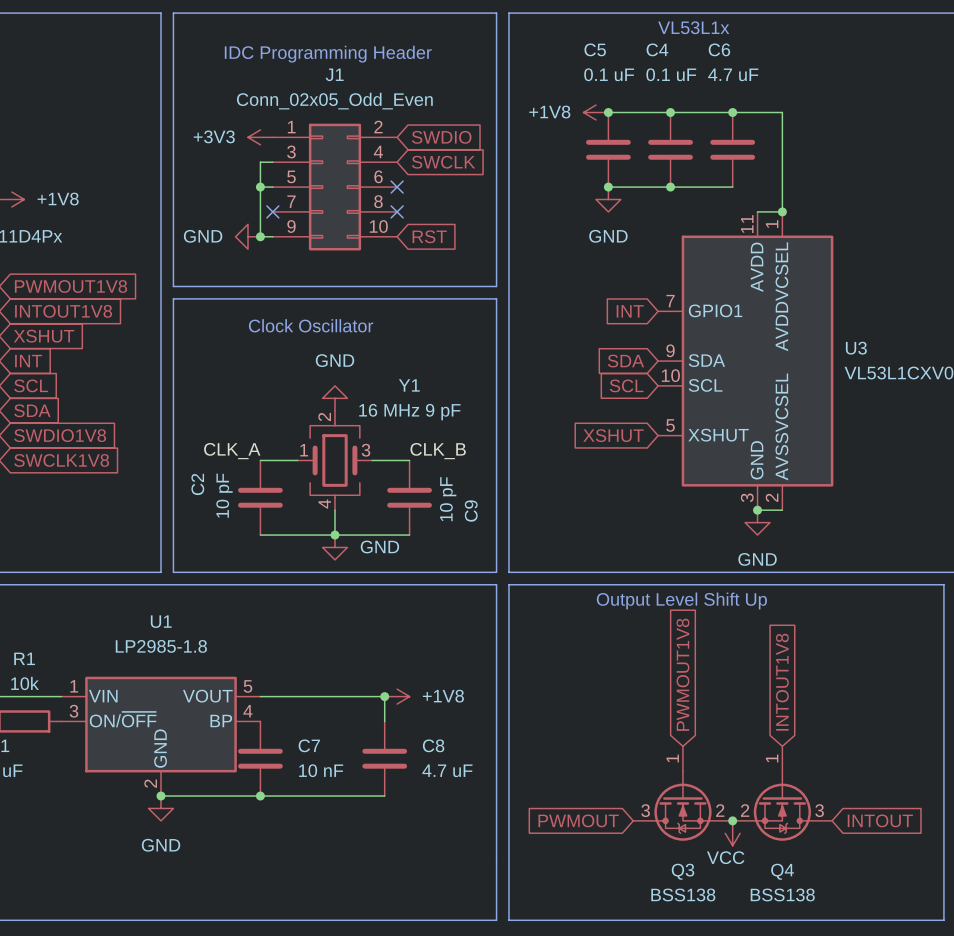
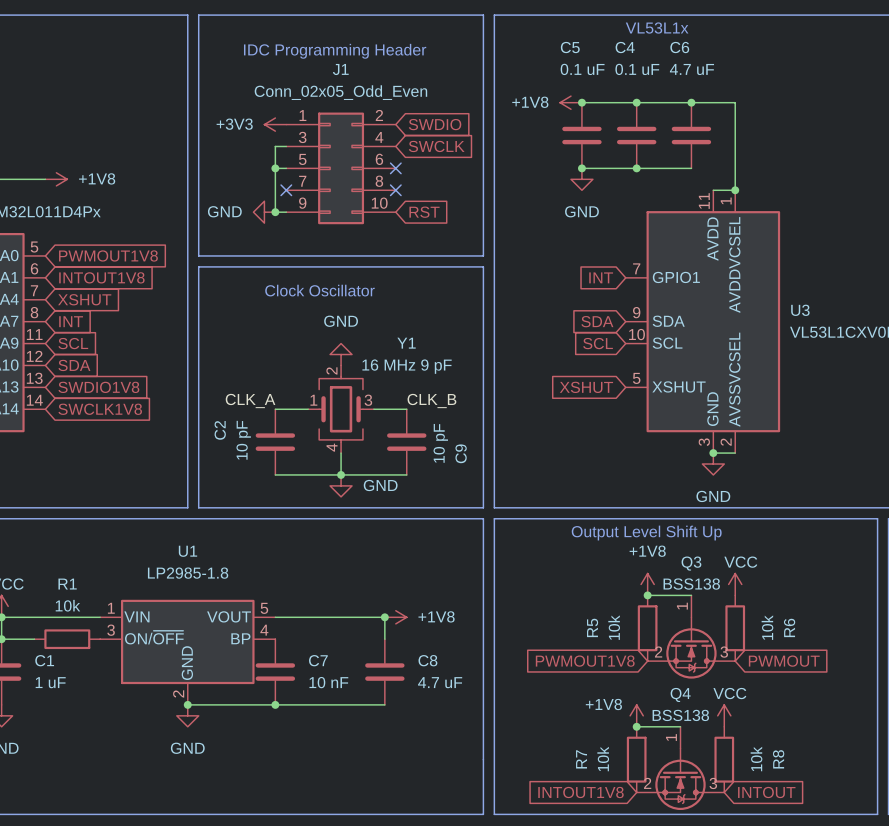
power symbol: none -> +1V8 (647, 584)
power symbol: none -> VCC (735, 584)
wire: none -> (647, 595) (691, 595)
junction: none -> (647, 595)
global label rotation: 0° (682, 674) -> 90° counterclockwise (585, 661)
global label: INTOUT1V8 (782, 682) -> PWMOUT (784, 661)
R5: none -> 10k (647, 628)
R6: none -> 10k (735, 628)
Q3 position: (682, 793) -> (691, 637)
Q4 position: (782, 793) -> (680, 768)
Q3 flip: as is (682, 805) -> left-right (691, 647)
power symbol: none -> +1V8 (636, 715)
global label: PWMOUT (578, 820) -> none
junction: none -> (636, 726)
junction: (732, 820) -> none
global label position: INTOUT (880, 820) -> INTOUT (766, 792)
power symbol rotation: 0° (732, 833) -> 180° (724, 715)
power symbol position: VCC (732, 833) -> VCC (724, 715)
R7: none -> 10k (636, 759)
R8: none -> 10k (724, 759)
Q3 name position: Q3 (682, 871) -> Q3 (691, 563)
Q4 name position: Q4 (782, 871) -> Q4 (680, 694)
Q3 value position: BSS138 (683, 894) -> BSS138 (691, 584)
Q4 value position: BSS138 (782, 894) -> BSS138 (680, 715)
global label: none -> INTOUT1V8 (580, 792)

